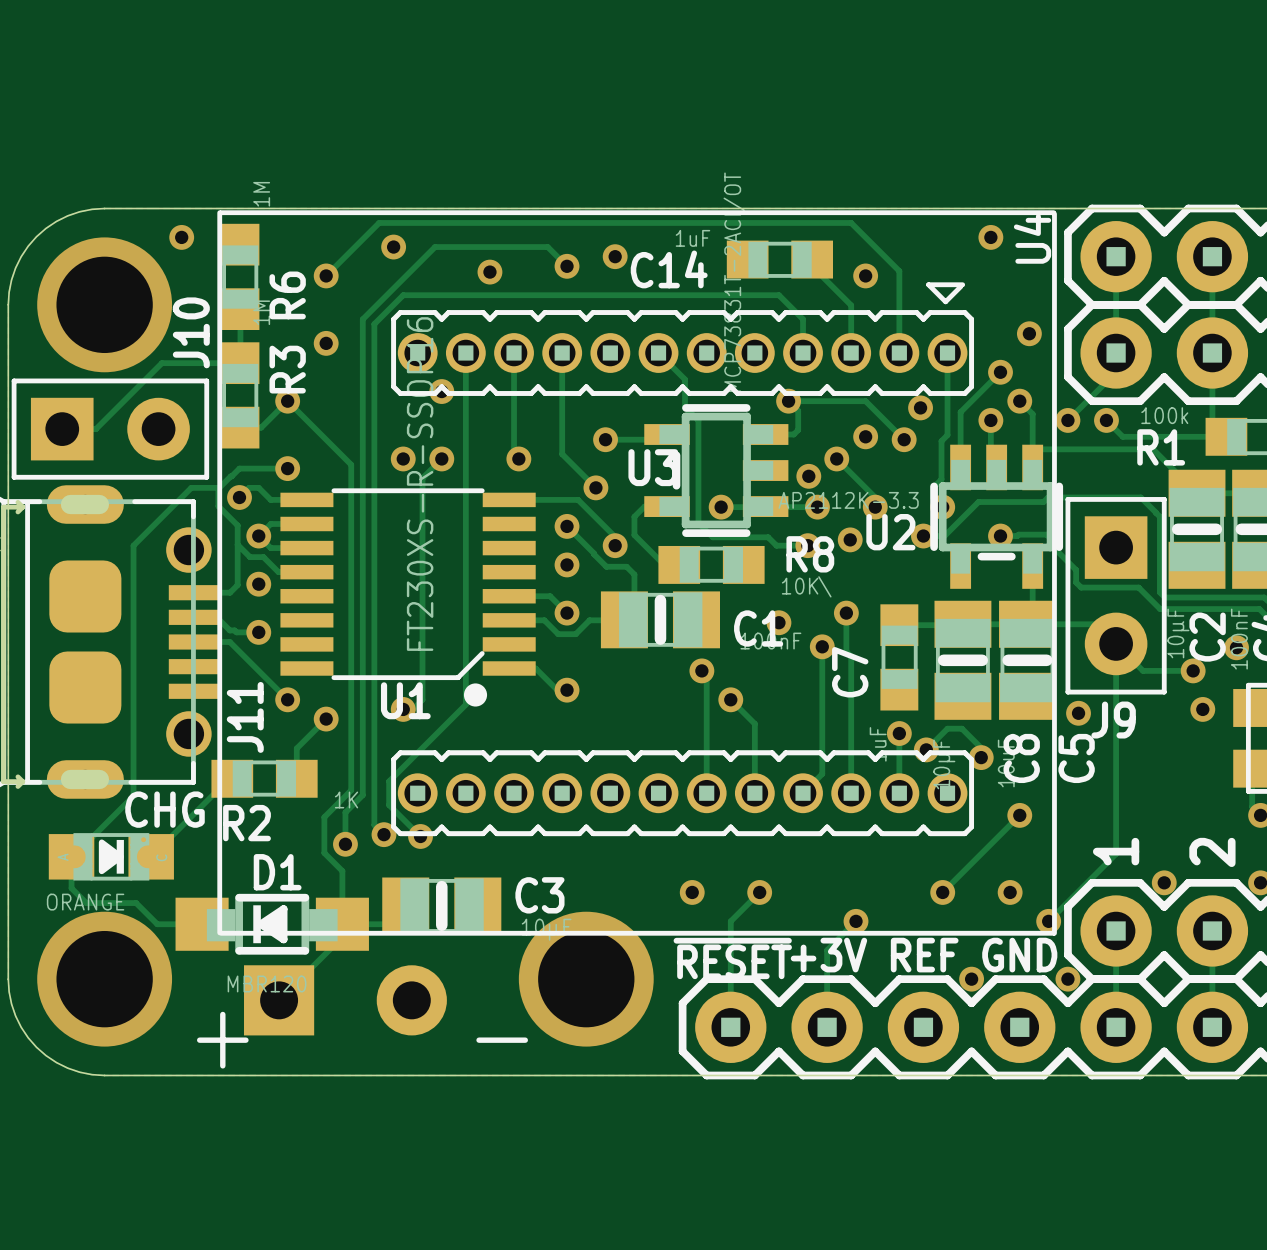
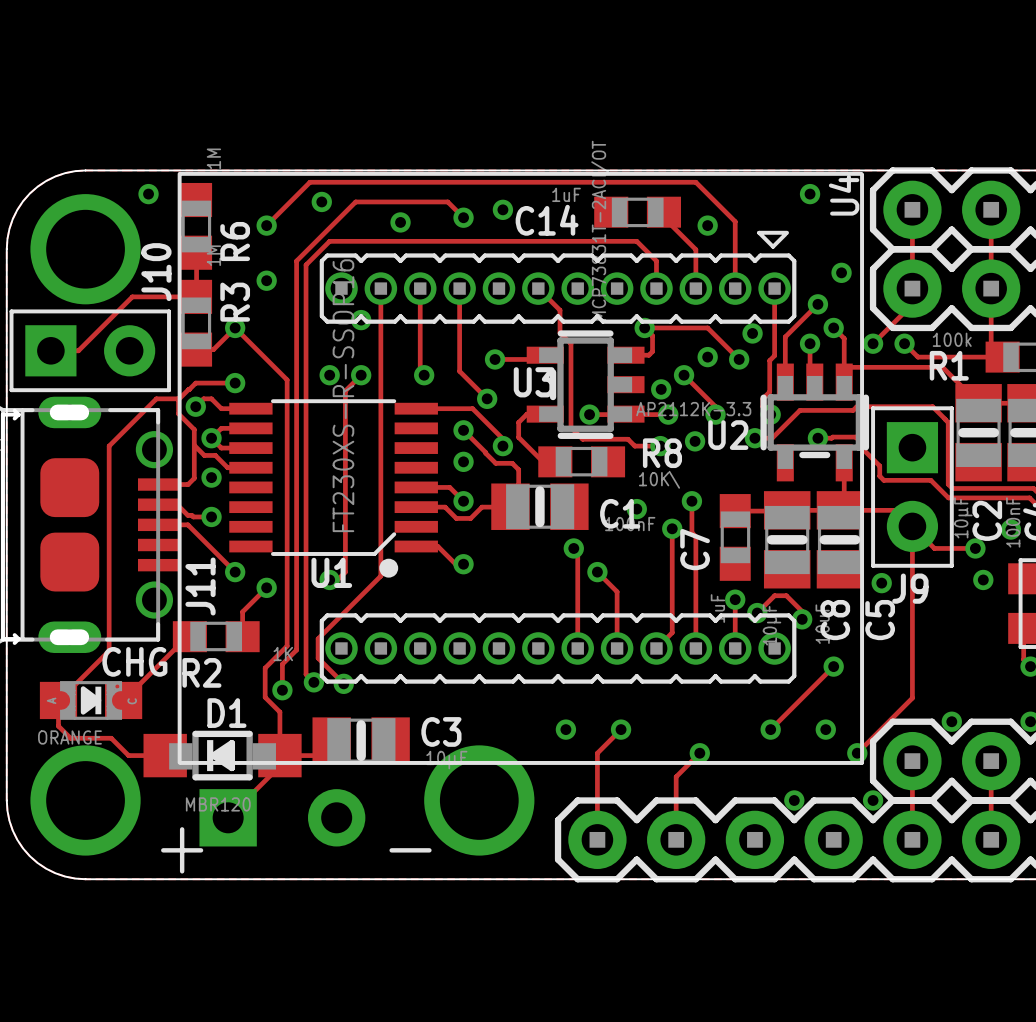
text: 1 (1116, 851) -> none
text: 2 (1212, 852) -> none
text: +3V (828, 955) -> none
text: REF (924, 955) -> none
text: GND (1019, 955) -> none
text: ~{RESET} (732, 958) -> none

